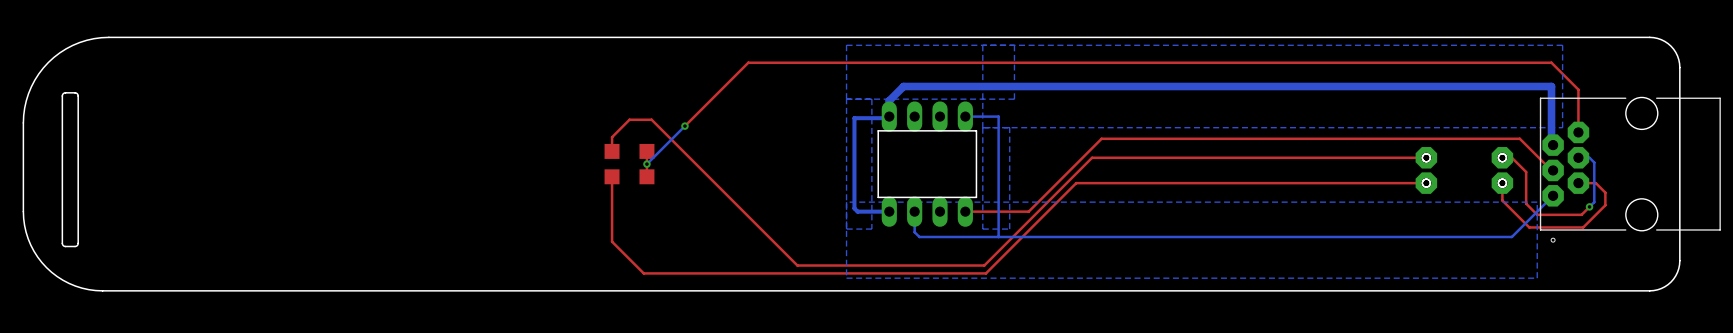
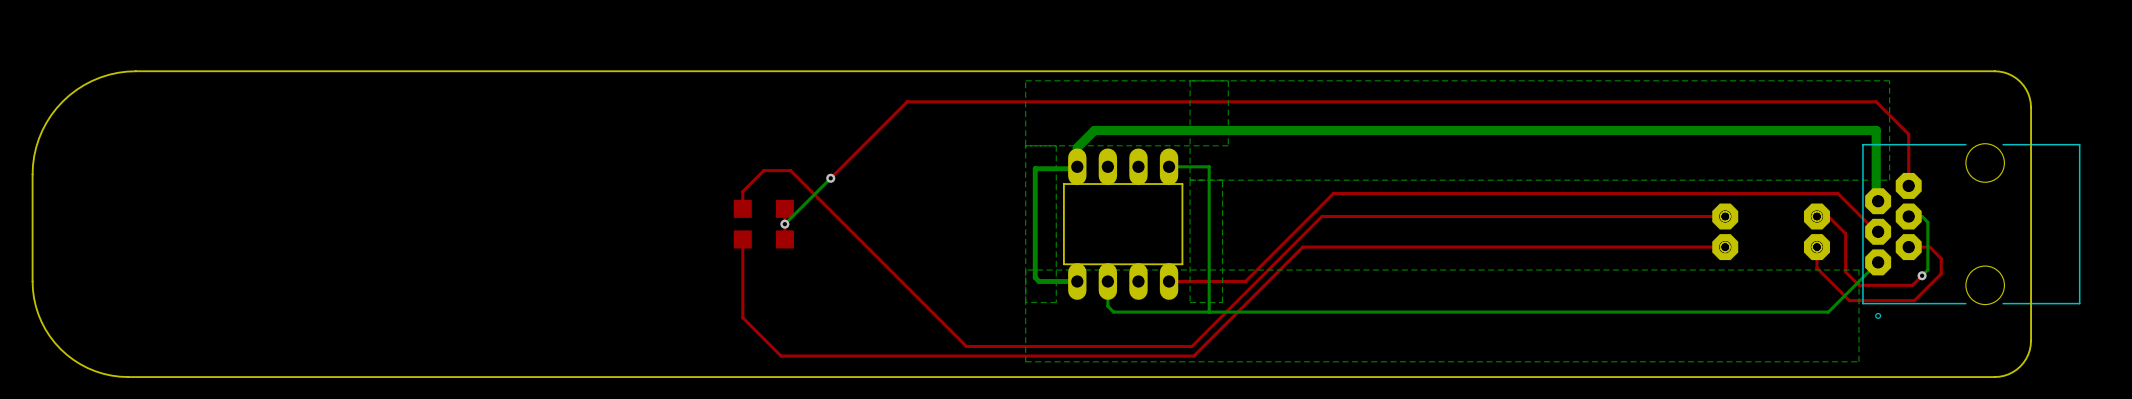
board edge: (75, 92) (64, 92) (62, 96) (62, 243) (65, 246) (75, 246) (78, 243) (78, 96) (75, 92) -> none

